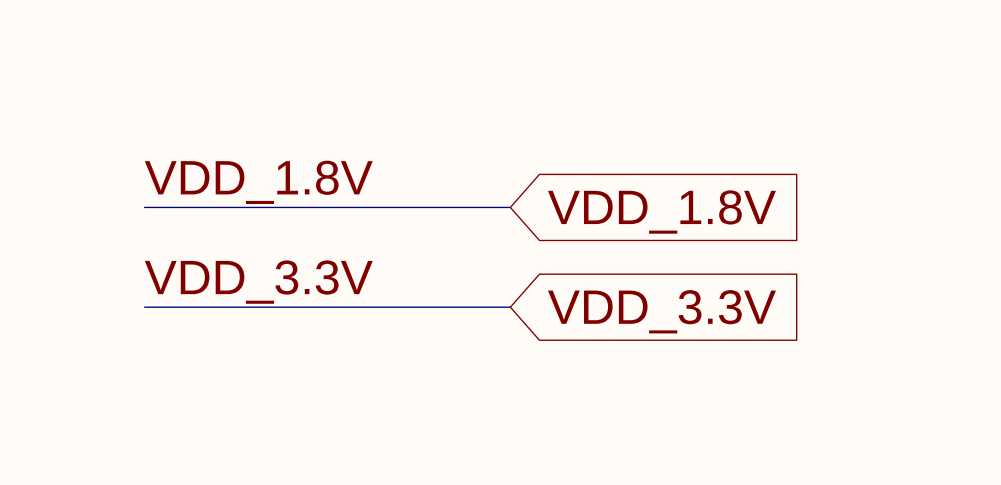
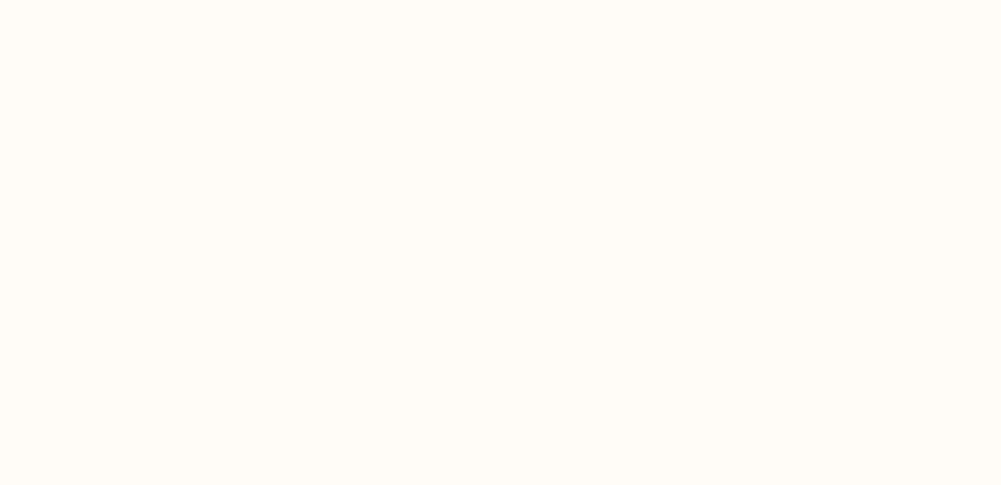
label: VDD_1.8V (258, 182) -> none
wire: (144, 207) (510, 207) -> none
global label: VDD_1.8V (661, 212) -> none
label: VDD_3.3V (258, 282) -> none
wire: (144, 307) (510, 307) -> none
global label: VDD_3.3V (661, 311) -> none

